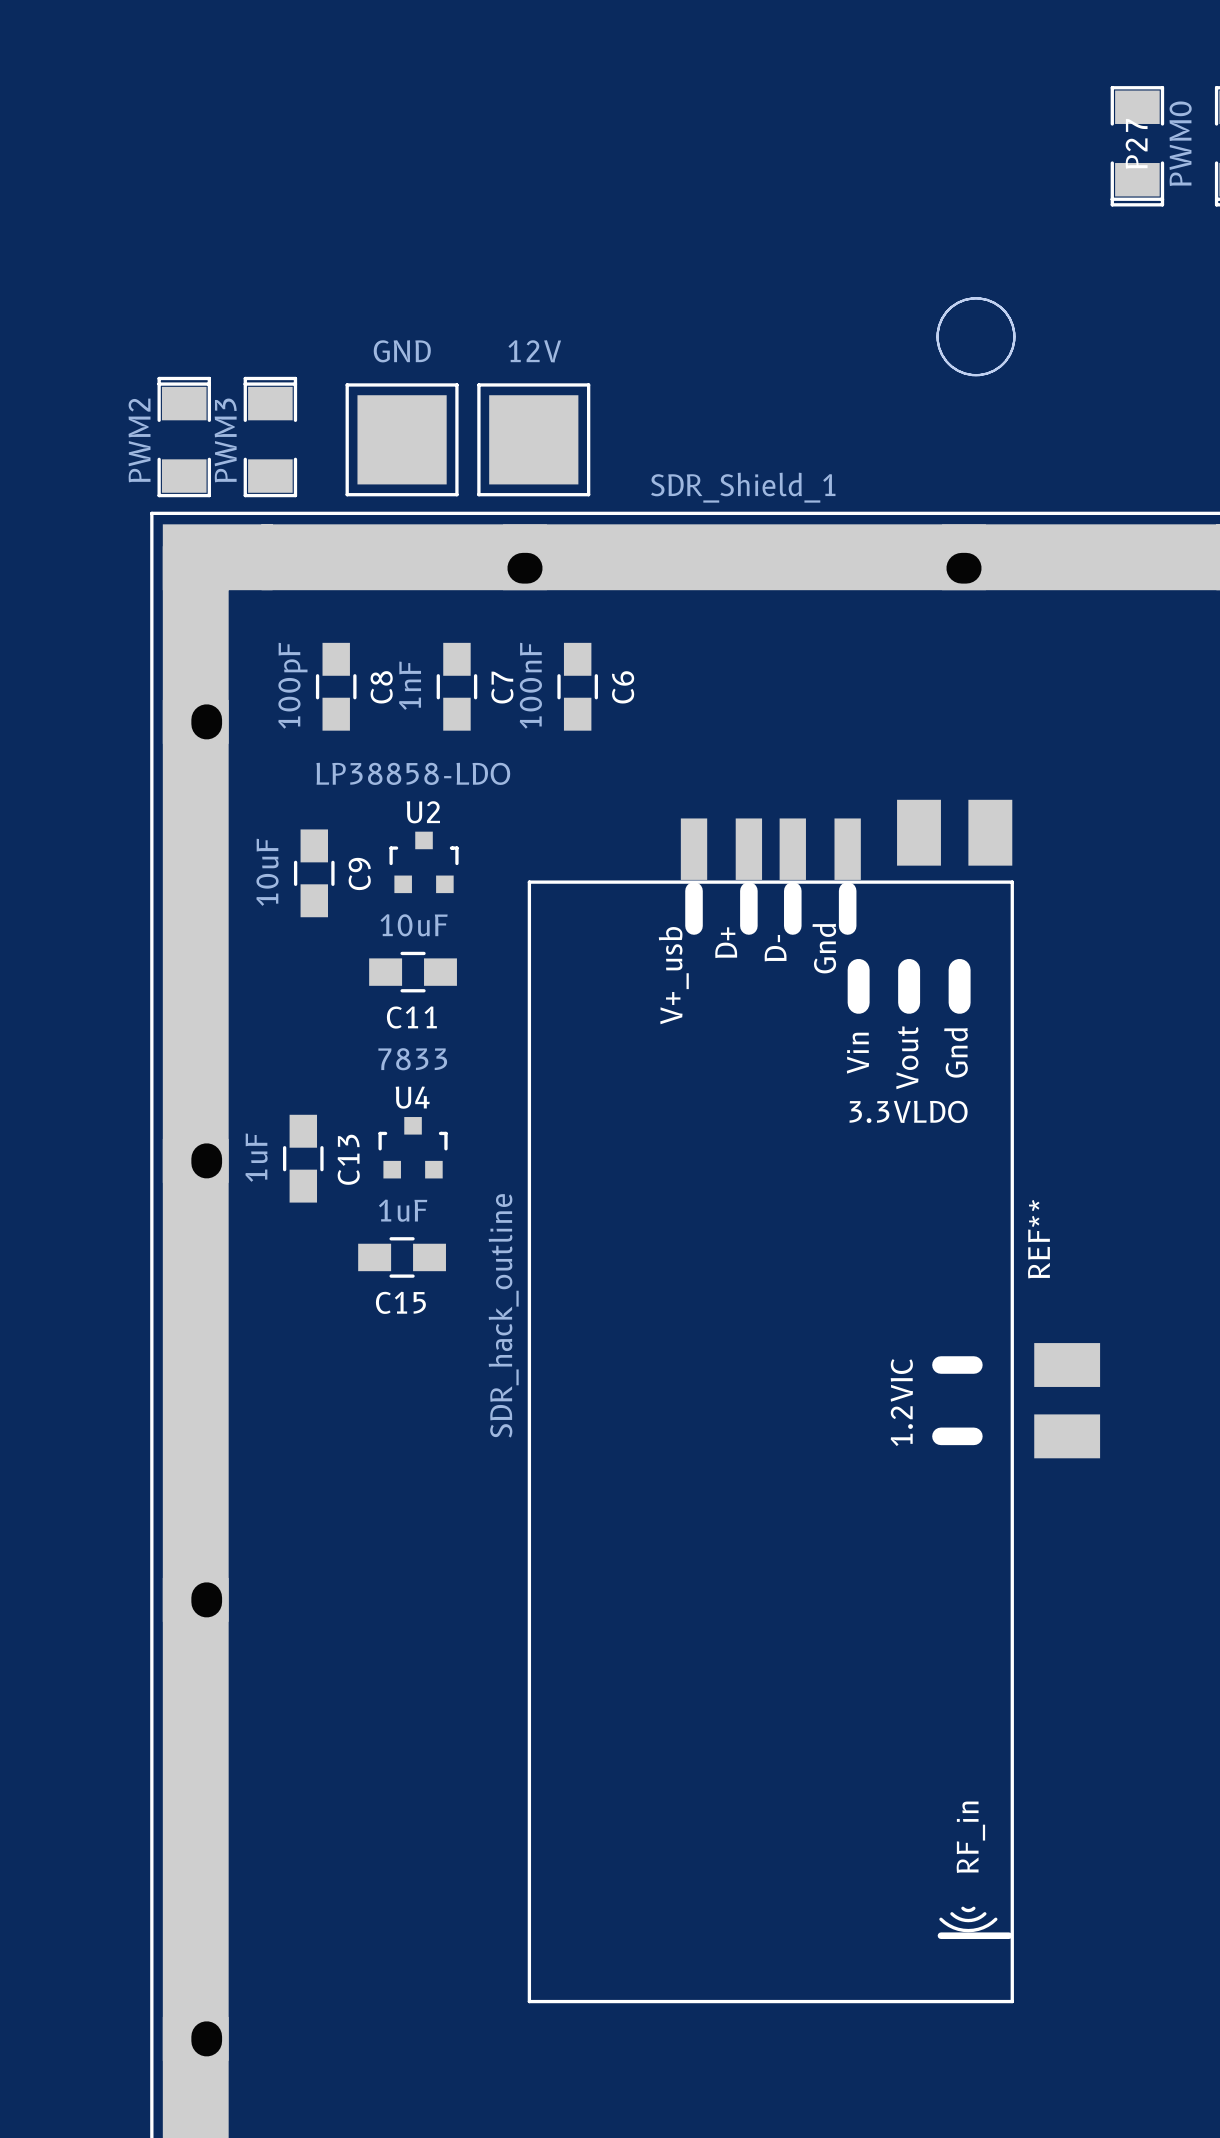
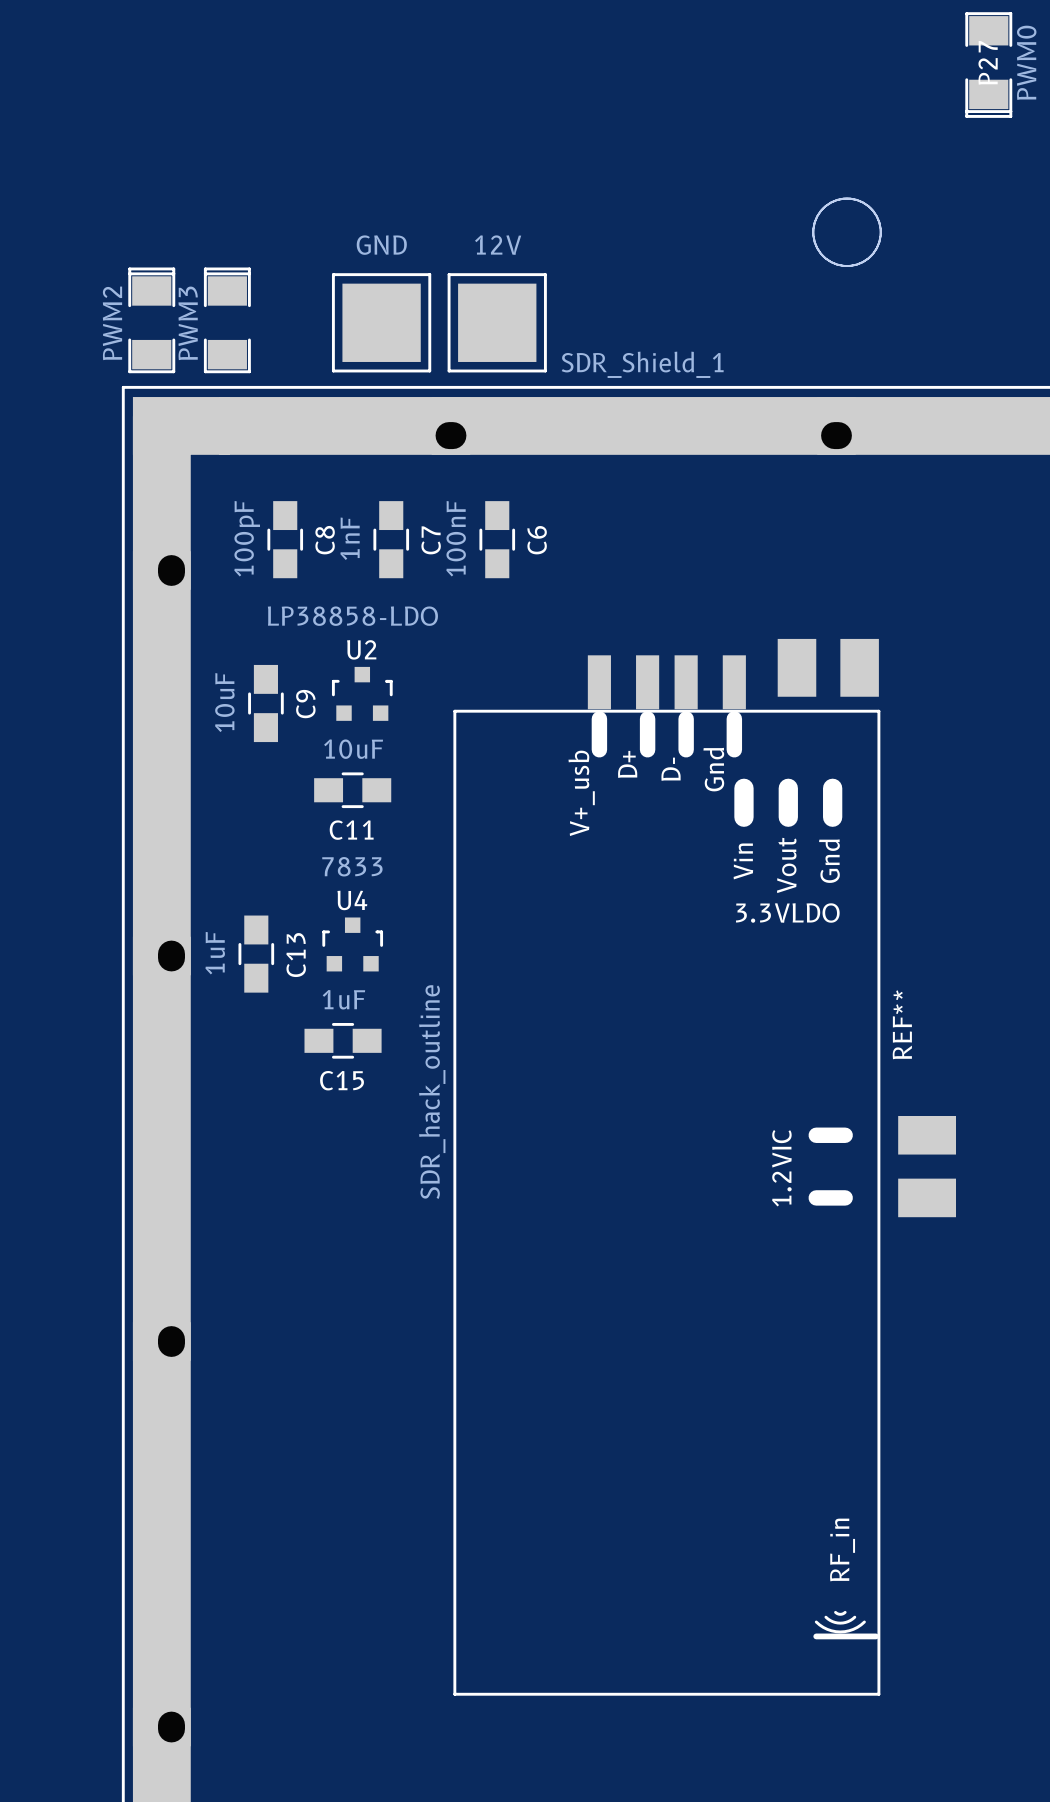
part position: (402, 439) -> (381, 322)
part position: (533, 439) -> (497, 322)

